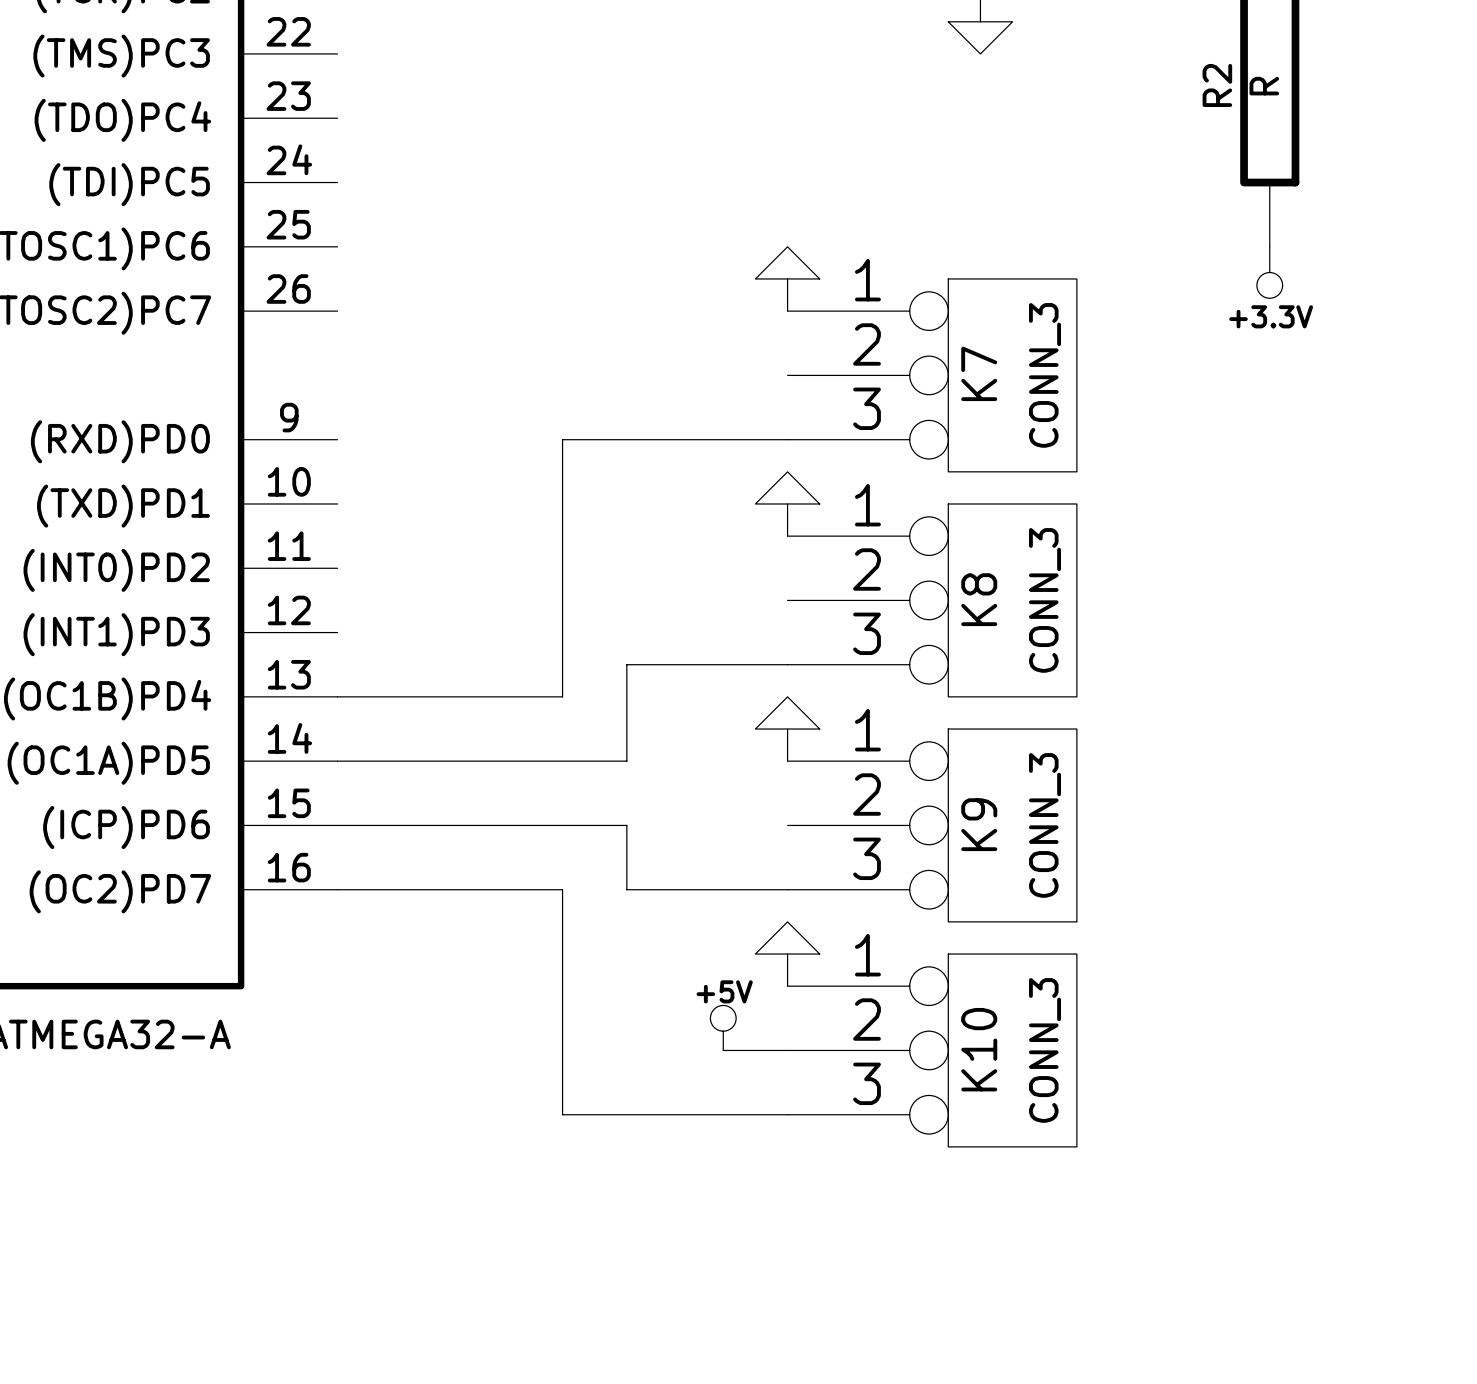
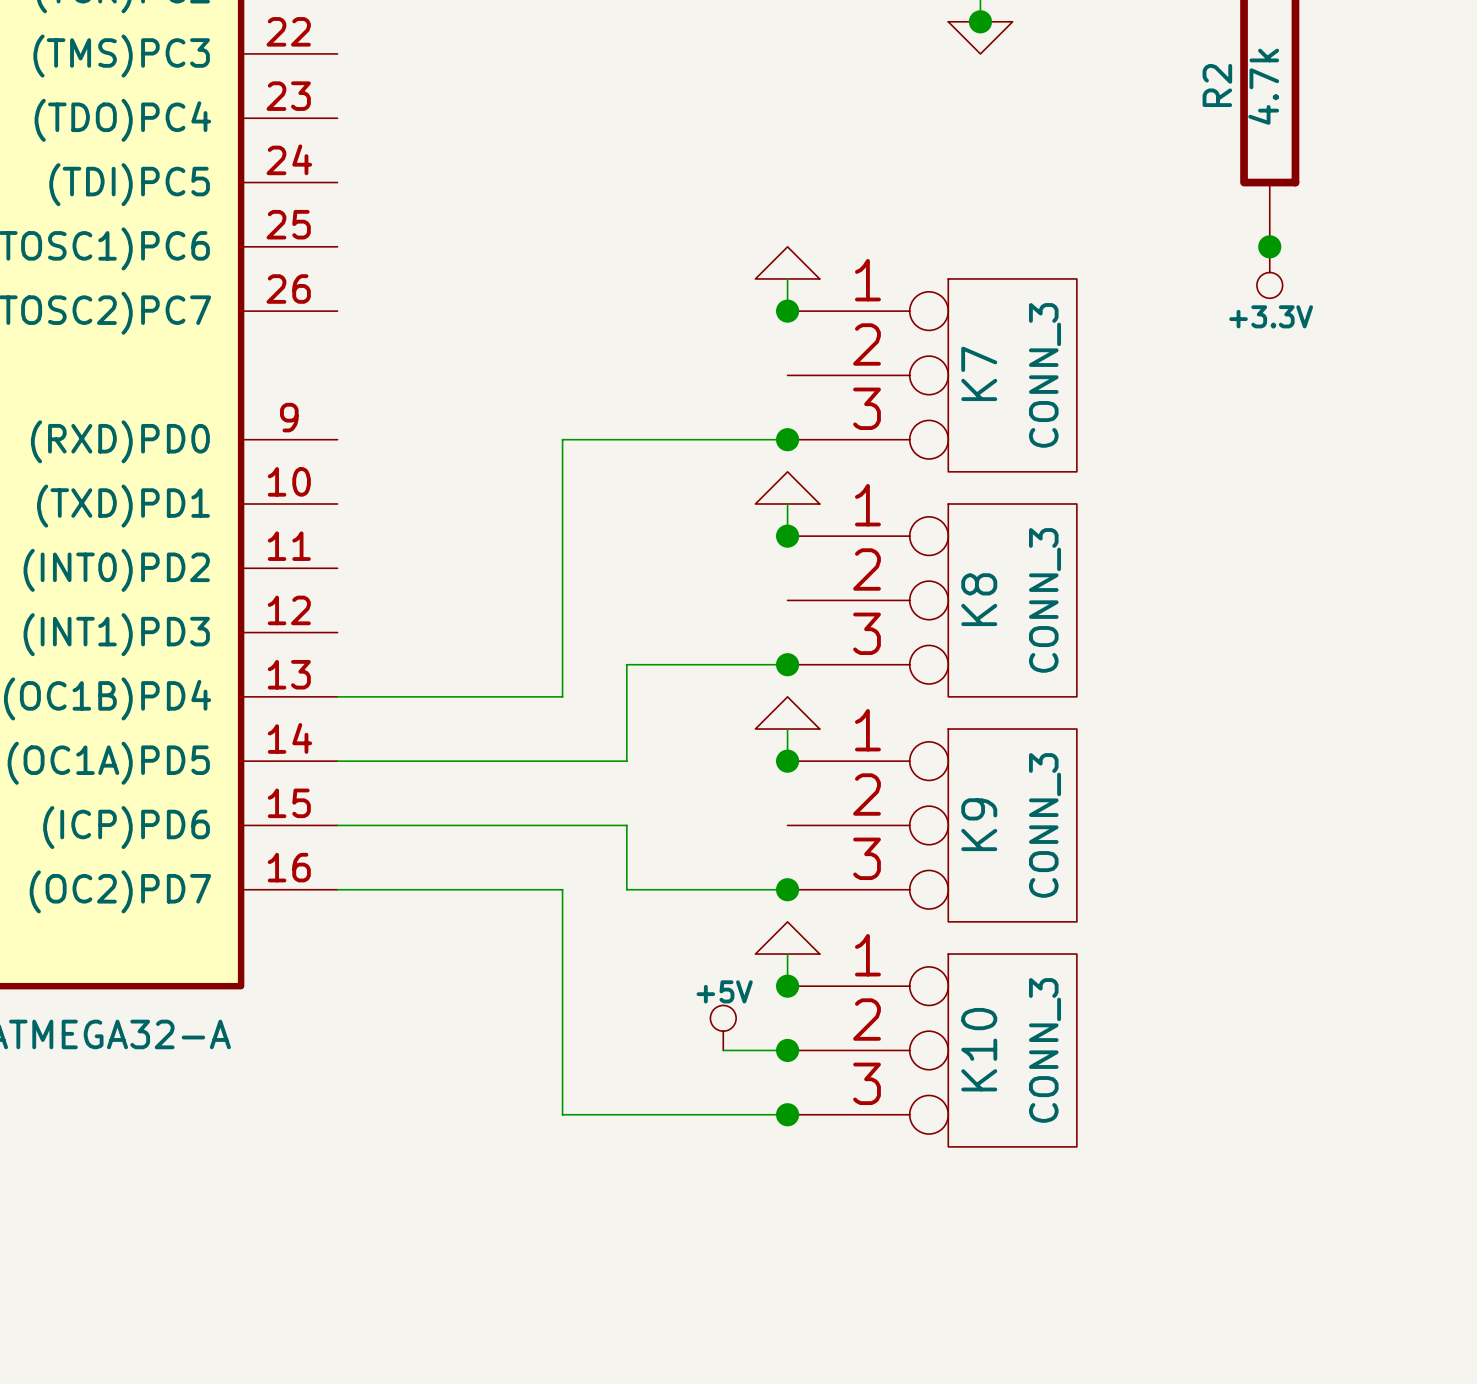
junction: none -> (980, 21)
R2 value: R (1264, 86) -> 4.7k (1263, 86)
junction: none -> (1269, 246)
junction: none -> (787, 311)
junction: none -> (787, 439)
junction: none -> (787, 536)
junction: none -> (787, 664)
junction: none -> (787, 761)
junction: none -> (787, 889)
junction: none -> (787, 986)
junction: none -> (787, 1050)
junction: none -> (787, 1114)

